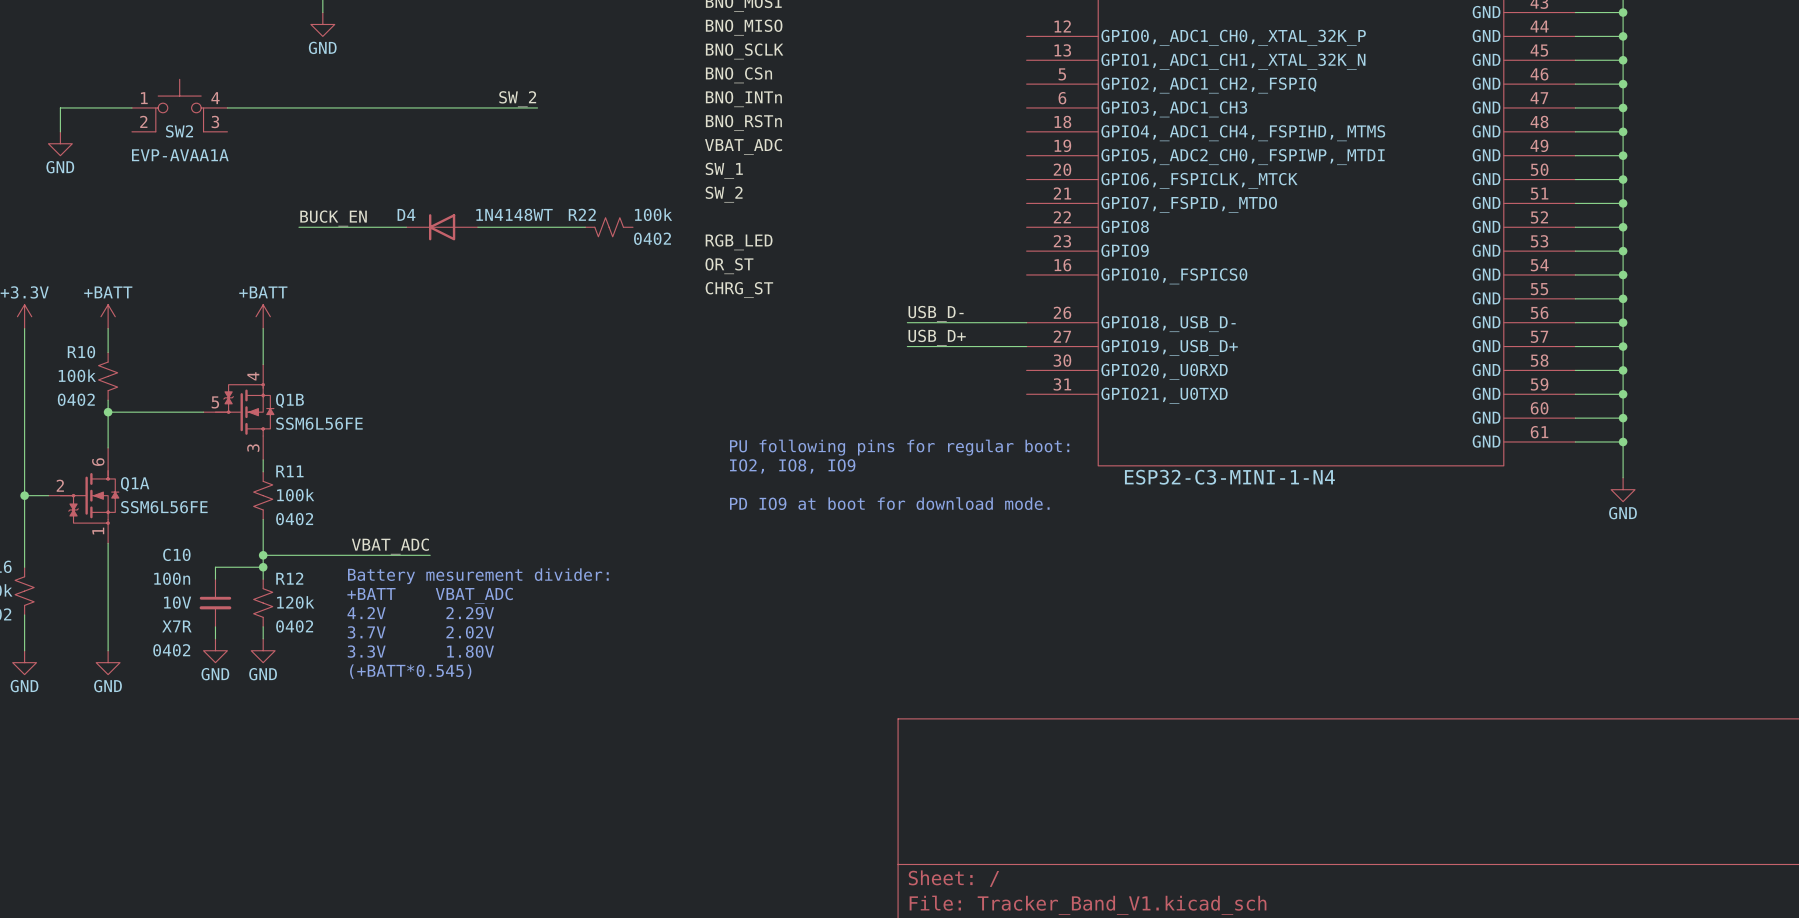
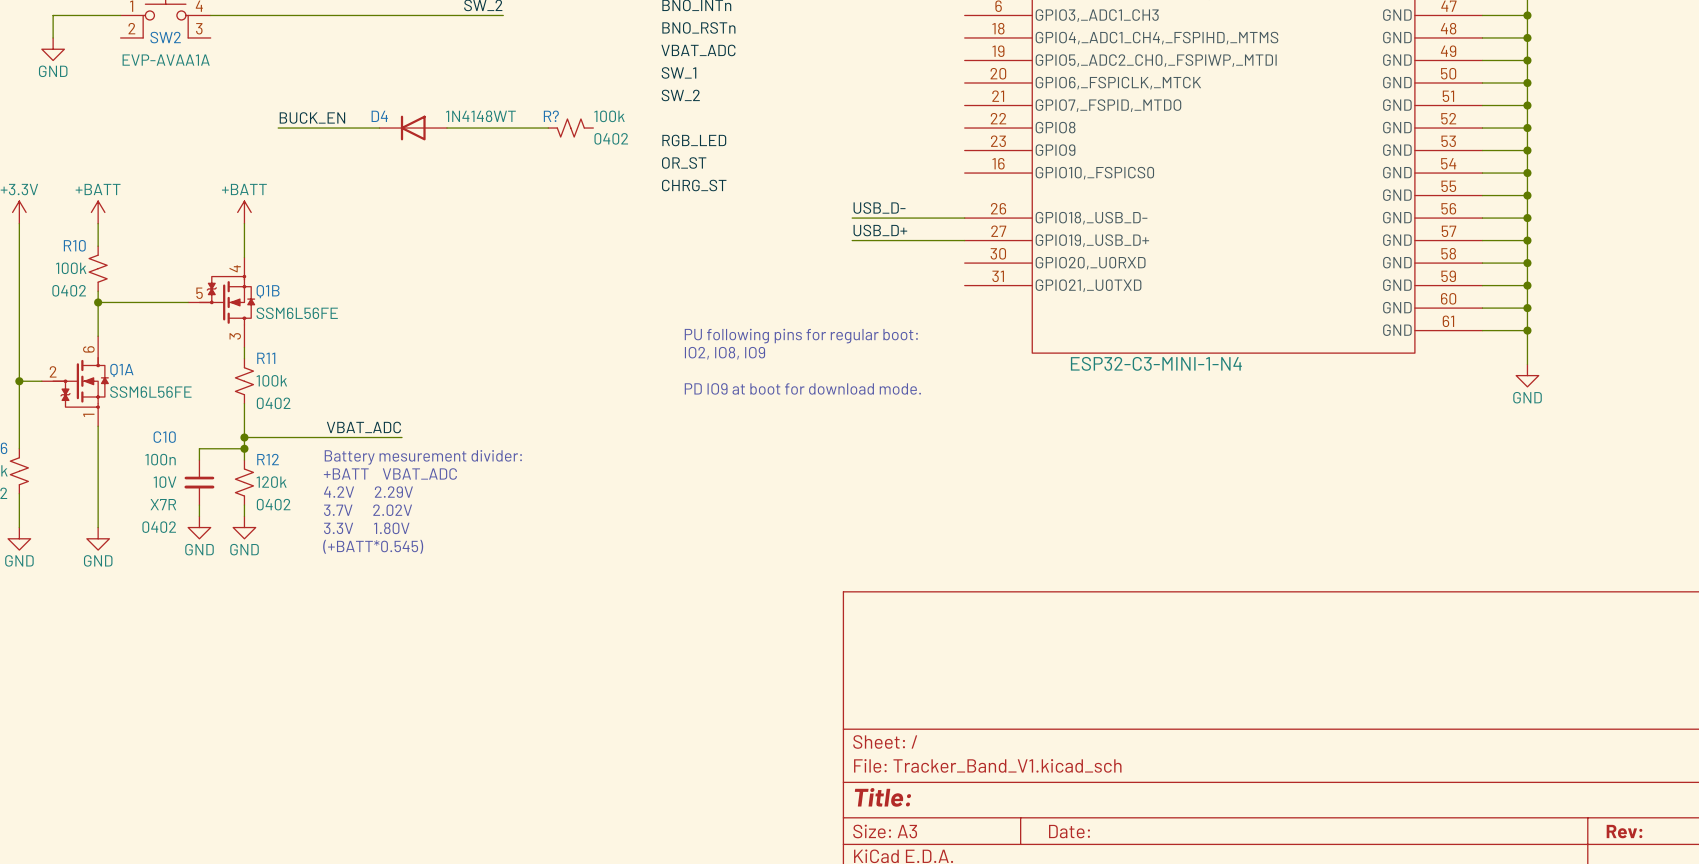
R22 name: R22 (582, 214) -> R? (551, 116)

